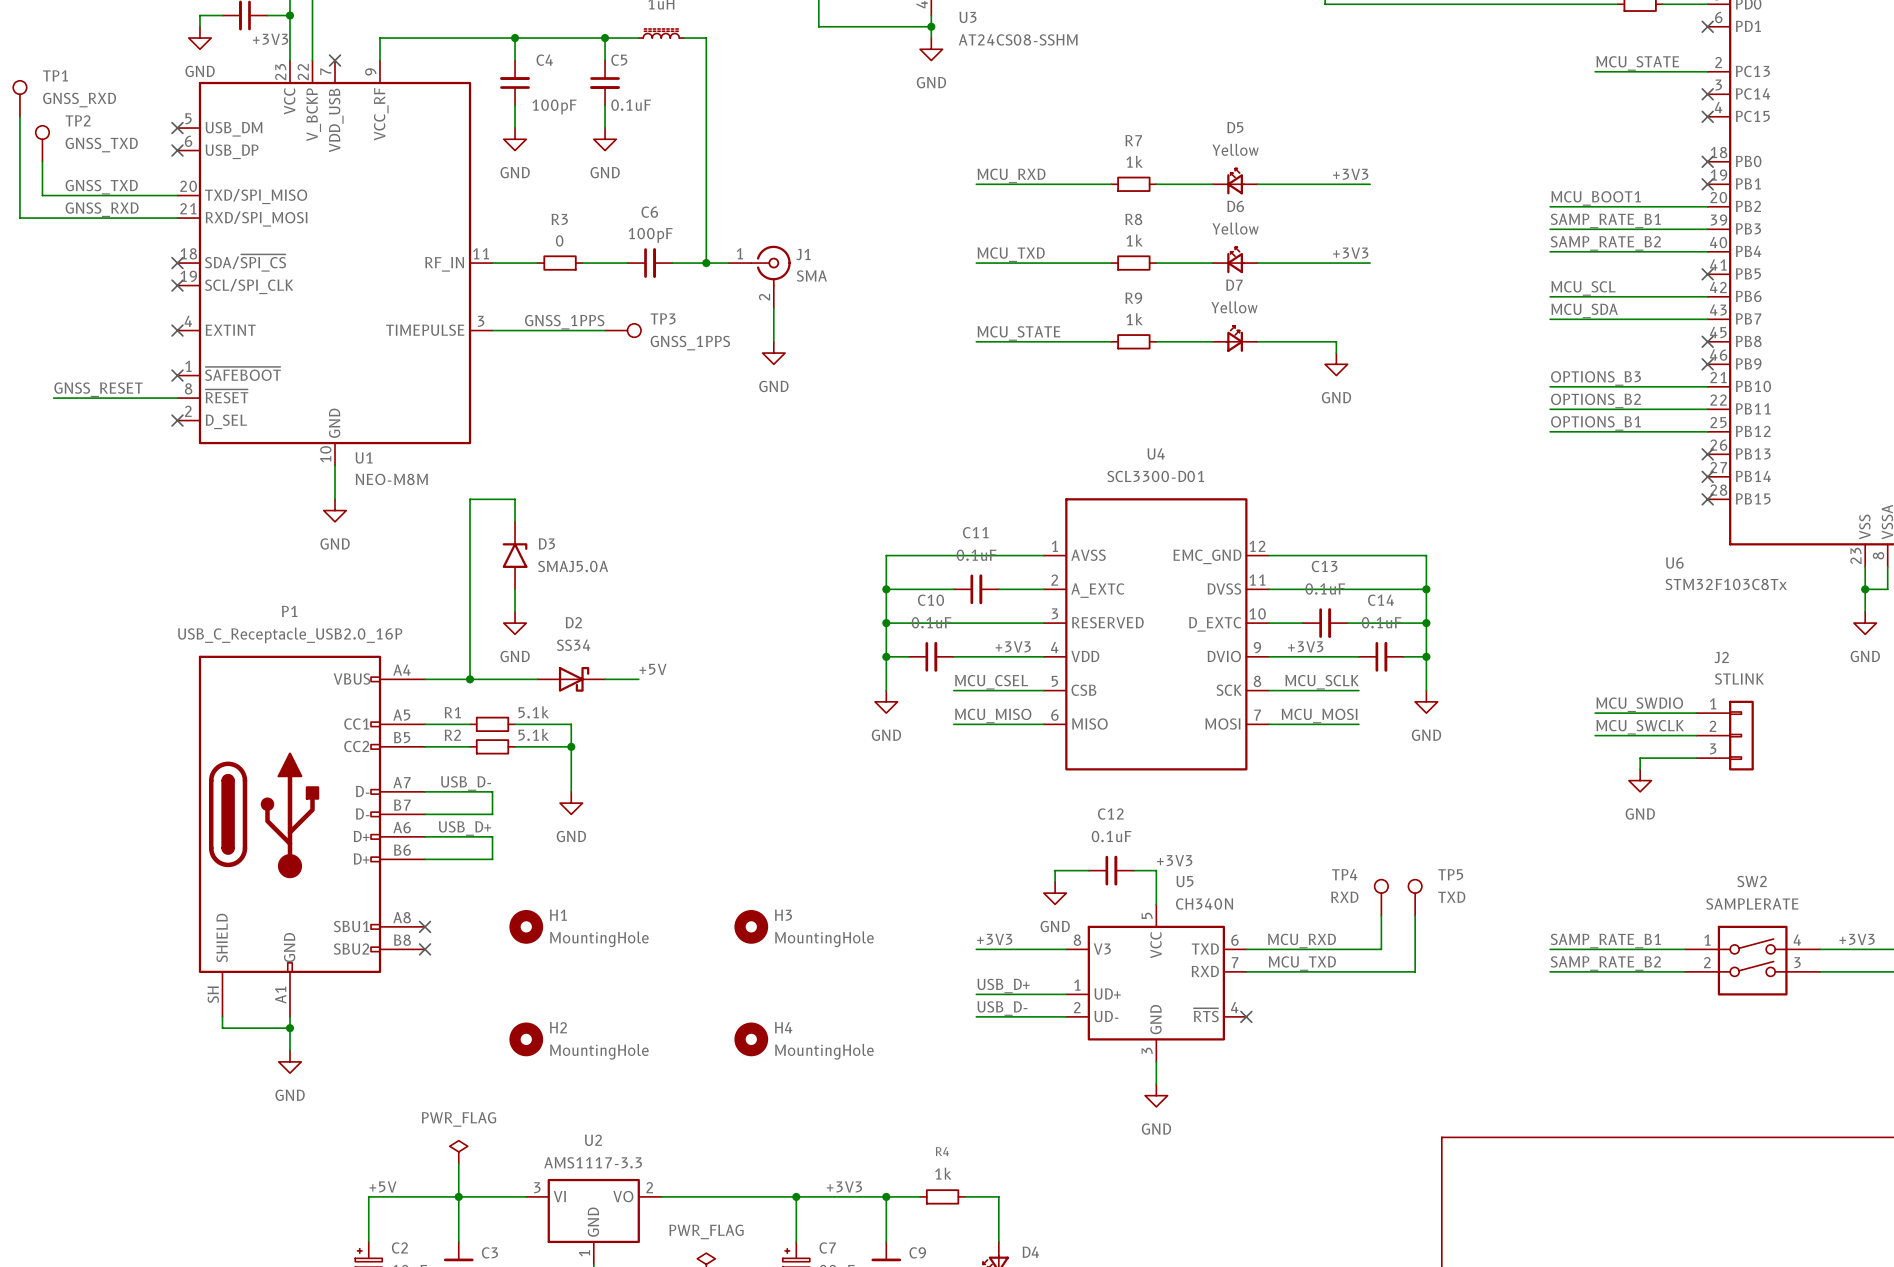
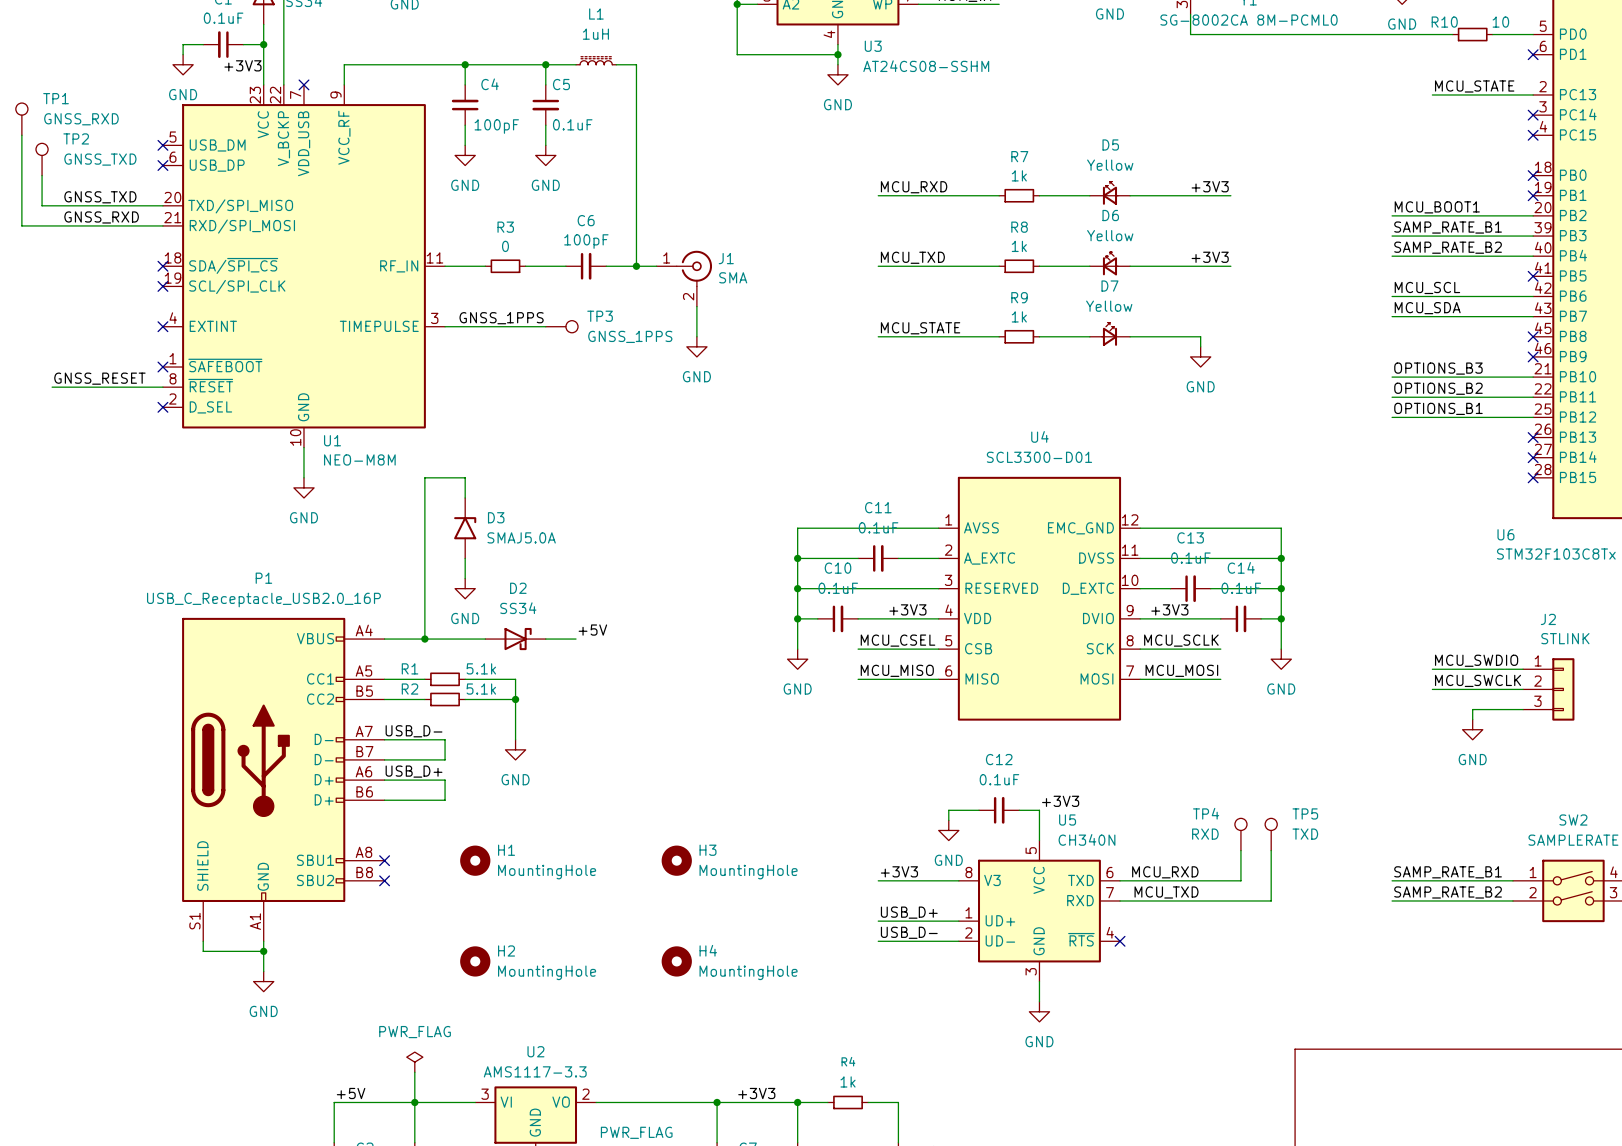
P1 pin number: SH (213, 994) -> S1 (194, 921)

